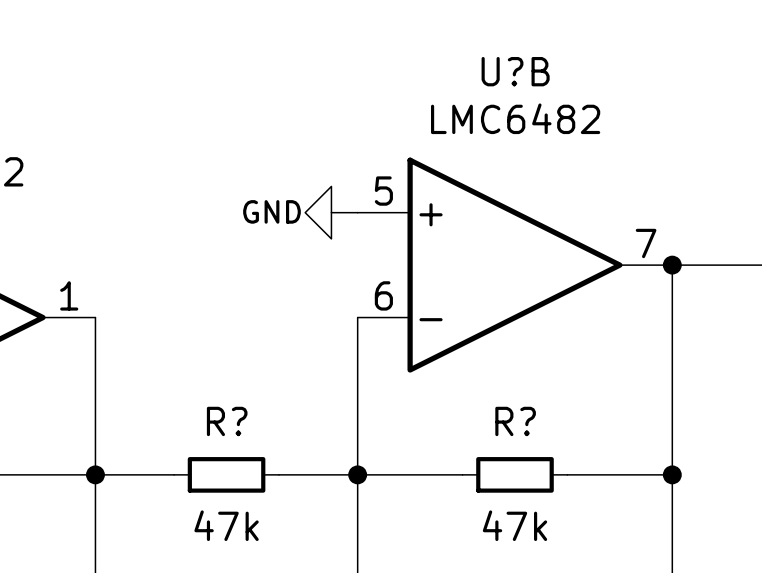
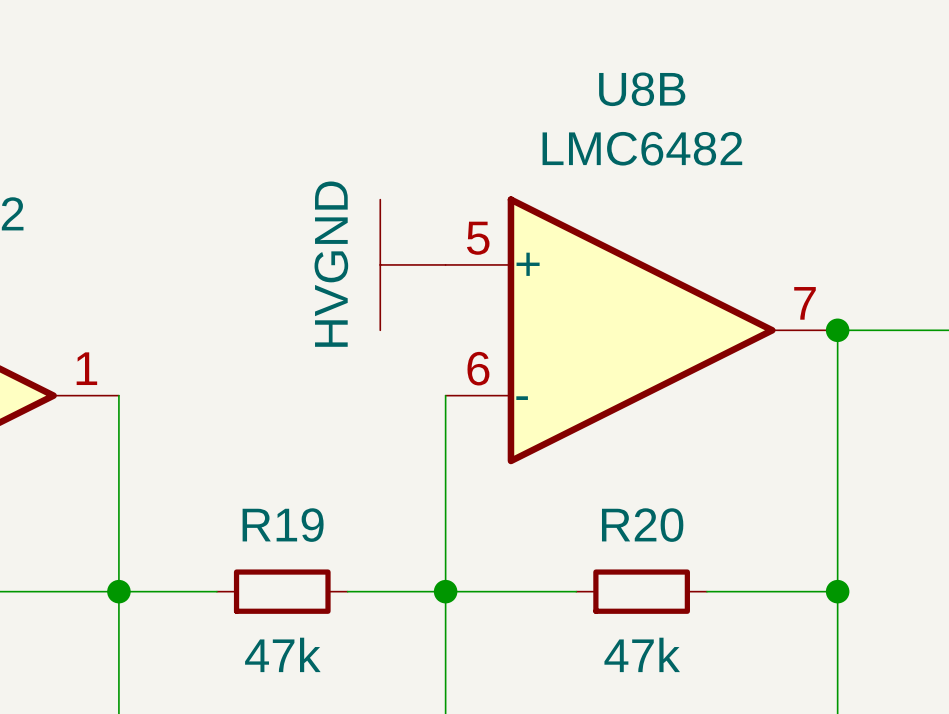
U?B name: U?B (515, 71) -> U8B (642, 89)
power symbol: GND (331, 212) -> HVGND (412, 264)
R? name: R? (227, 421) -> R19 (283, 525)
R? name: R? (515, 421) -> R20 (642, 525)

